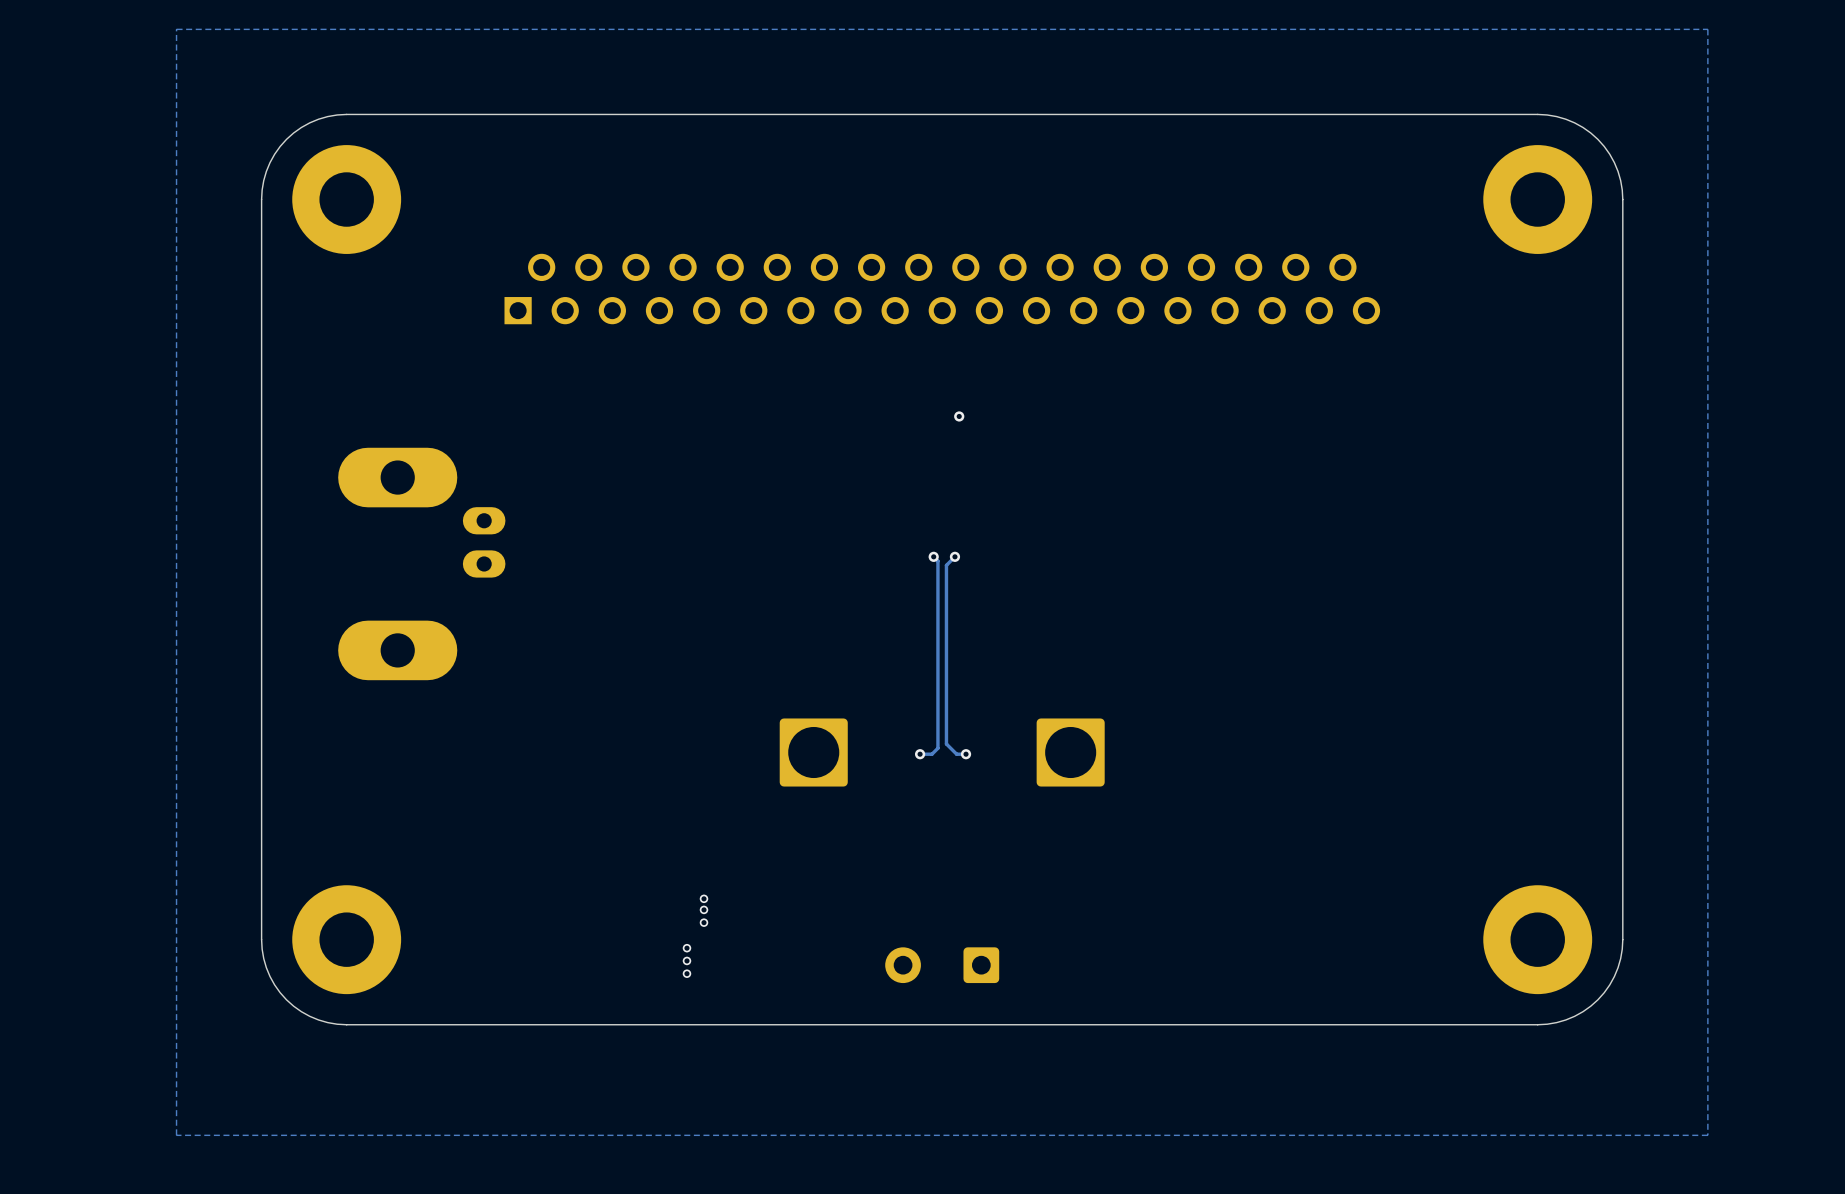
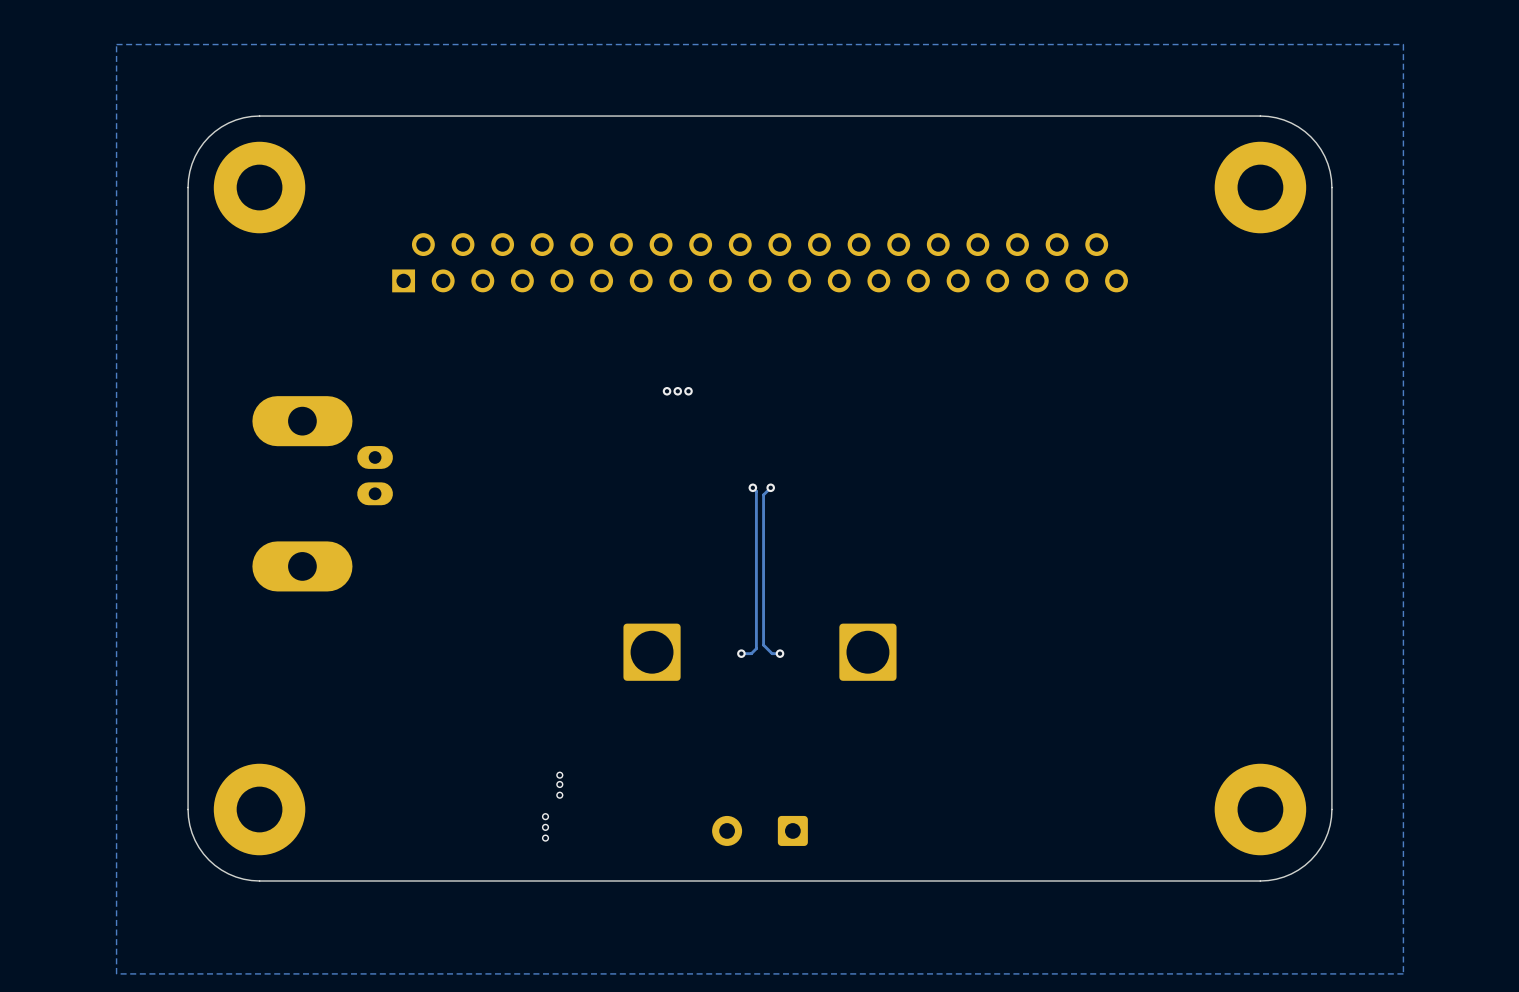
via: (959, 416) -> none
via: none -> (667, 391)
via: none -> (677, 391)
via: none -> (688, 391)

